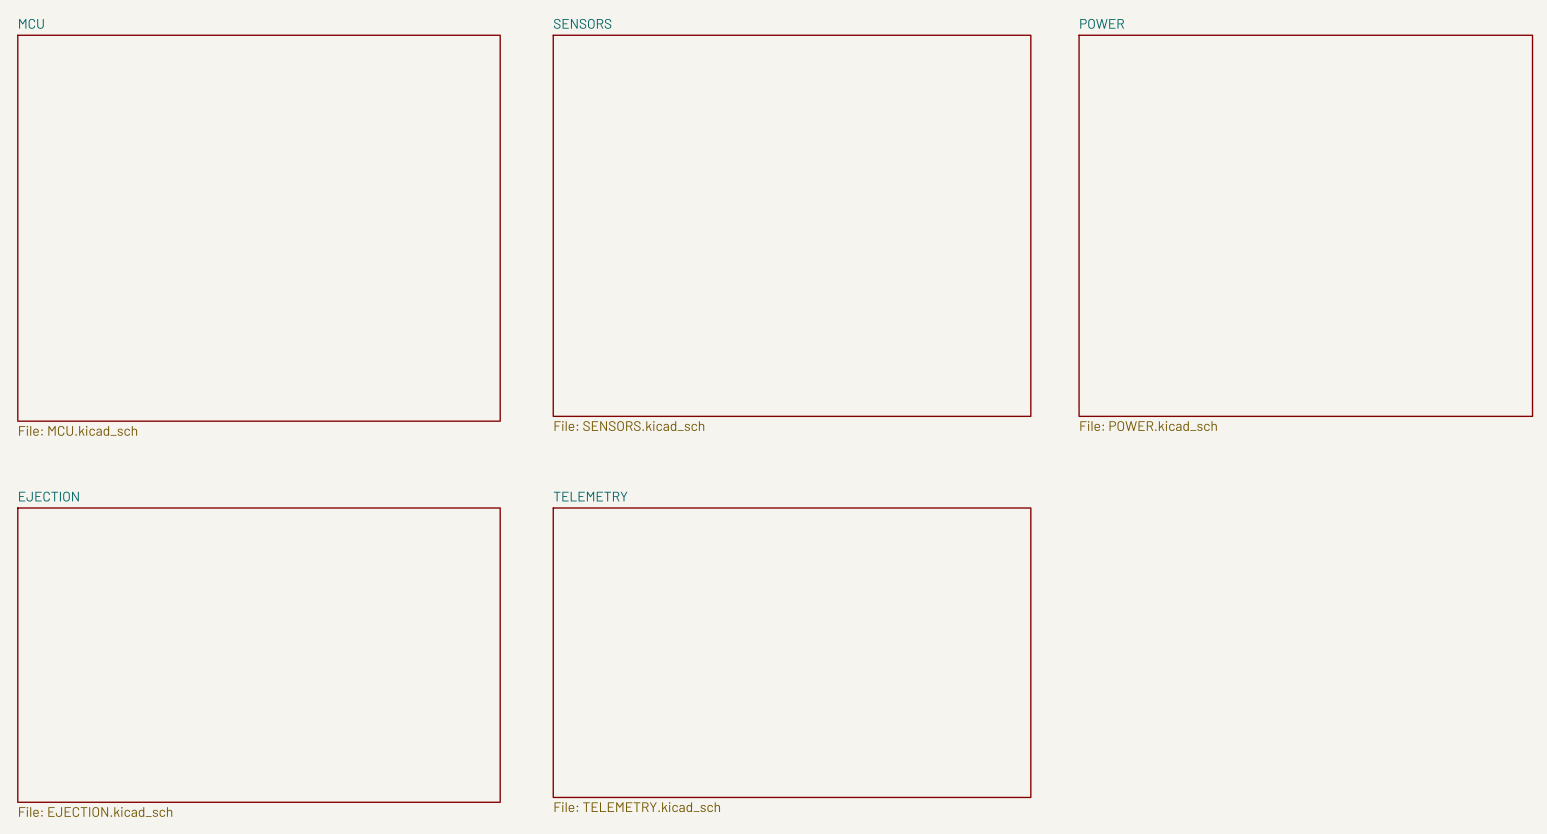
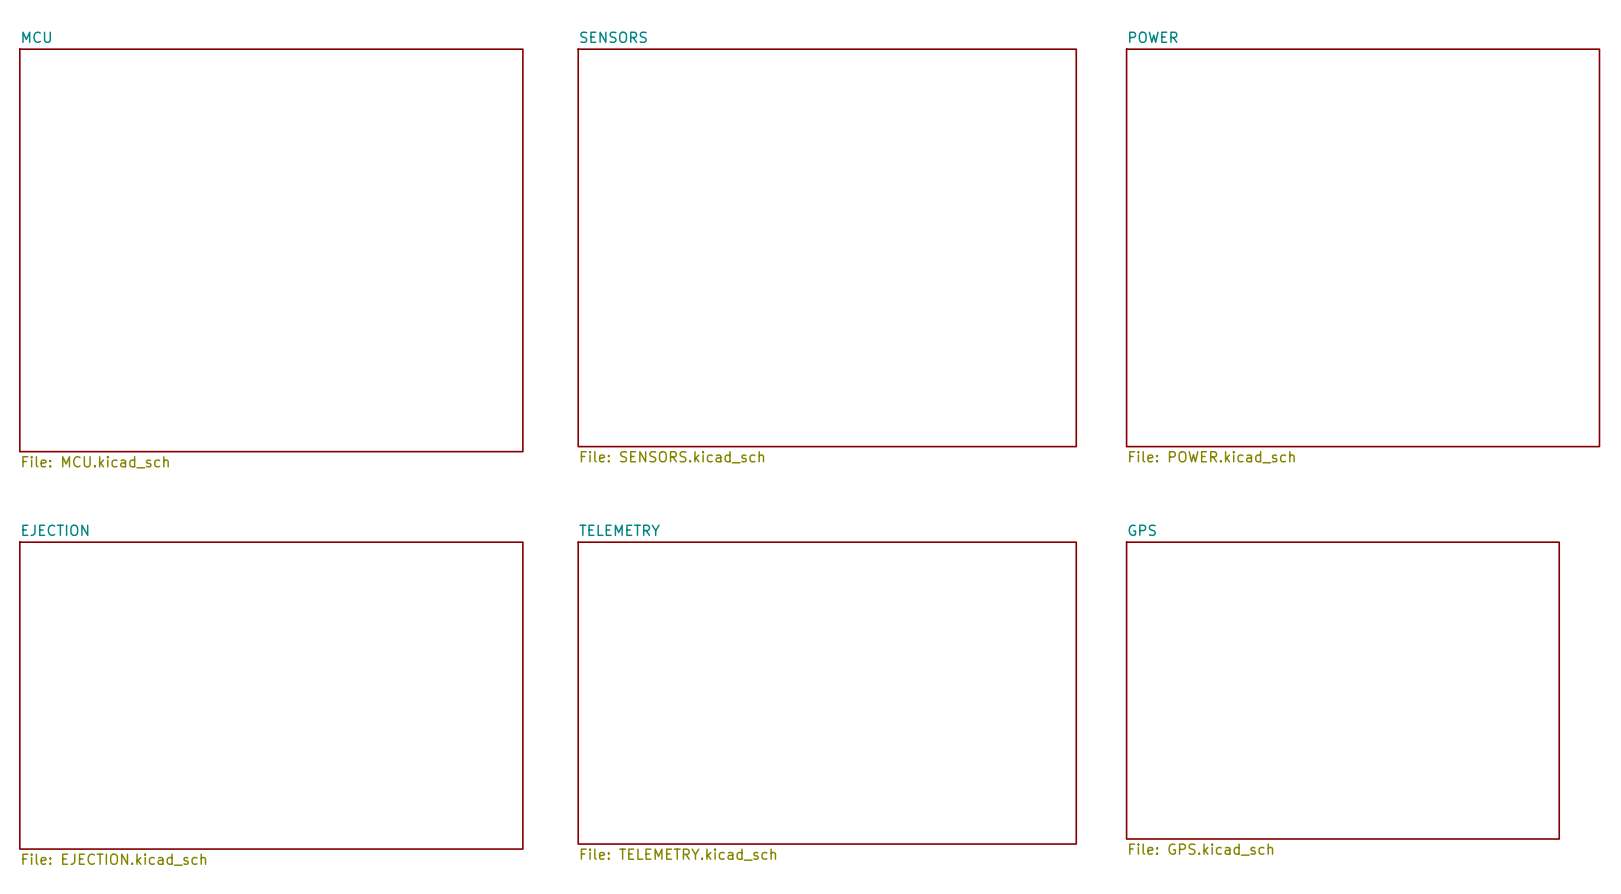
sheet GPS: none -> File: GPS.kicad_sch (1342, 690)

